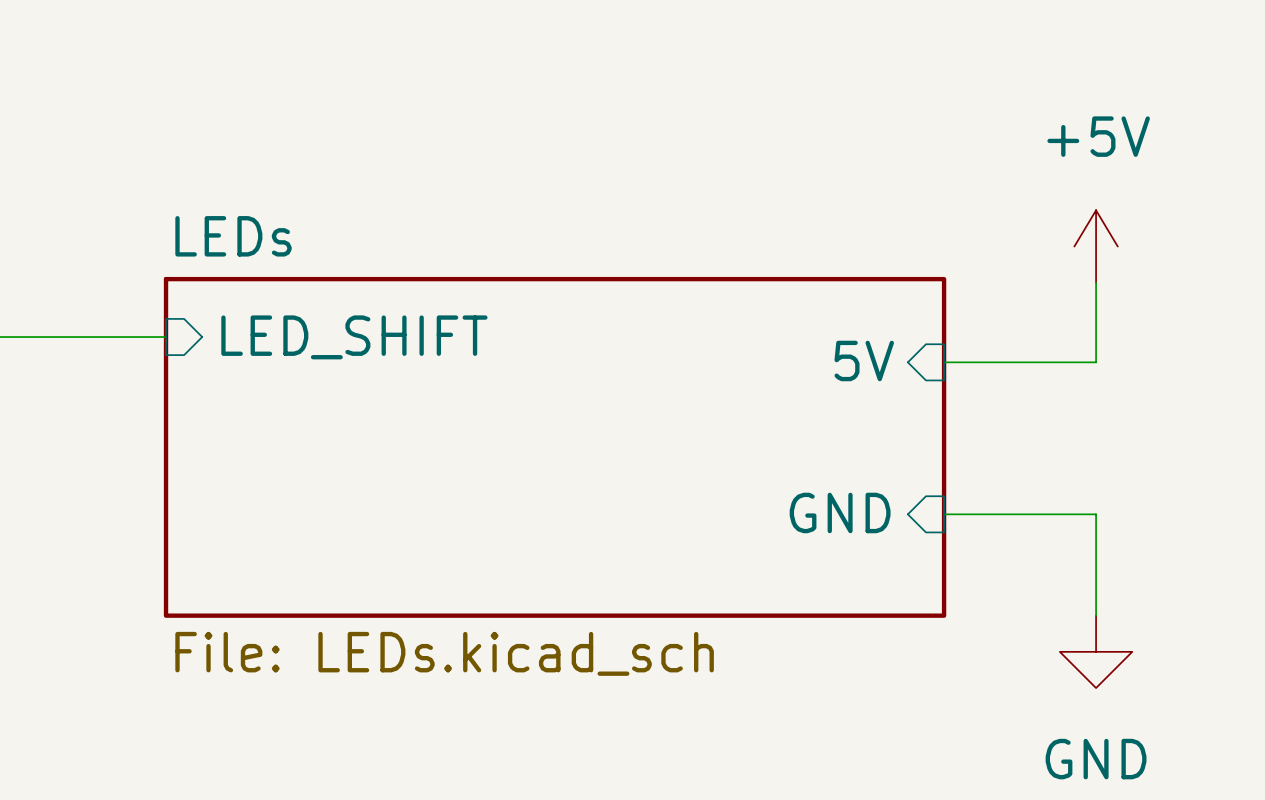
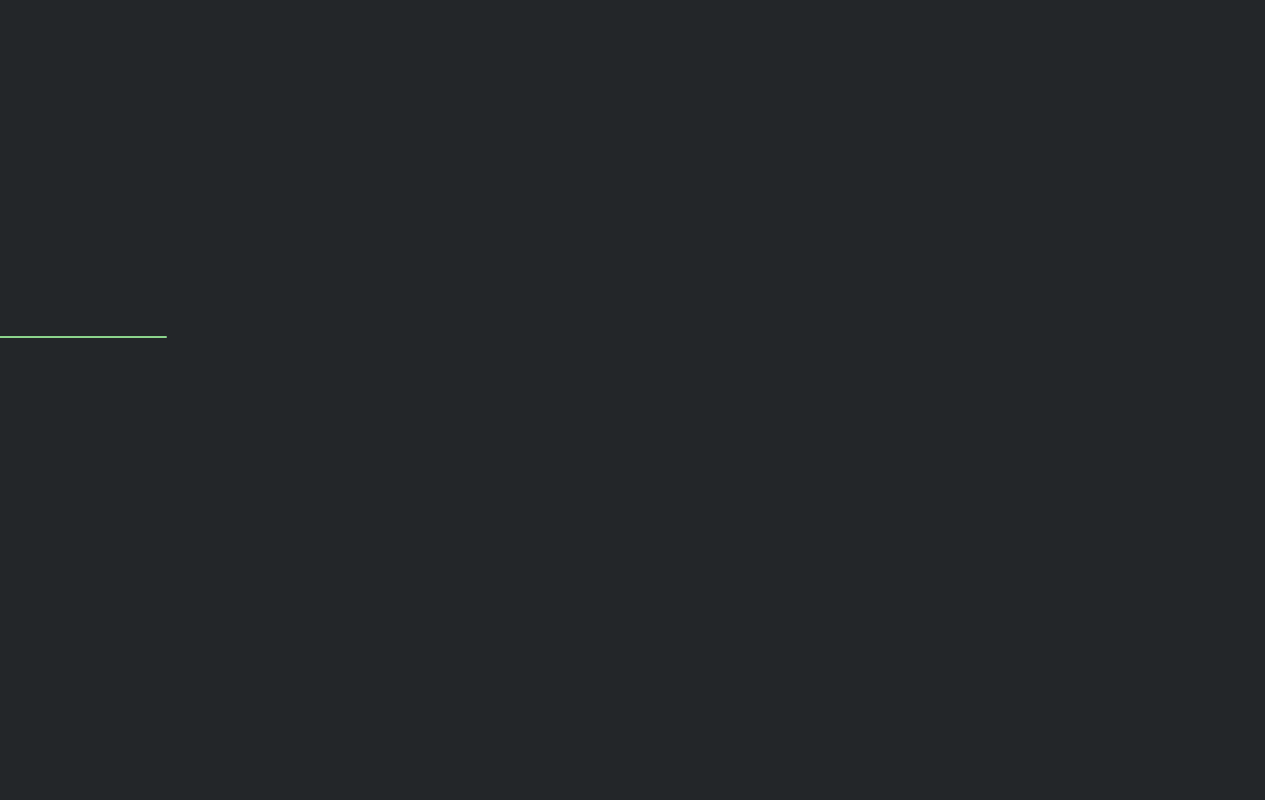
power symbol: +5V (1096, 246) -> none
wire: (1096, 282) (1096, 362) (944, 362) -> none
sheet pin: LED_SHIFT (354, 337) -> none
sheet pin: 5V (864, 360) -> none
sheet LEDs: File: LEDs.kicad_sch (555, 447) -> none
sheet pin: GND (840, 512) -> none
wire: (944, 514) (1096, 514) (1096, 615) -> none
power symbol: GND (1096, 651) -> none

